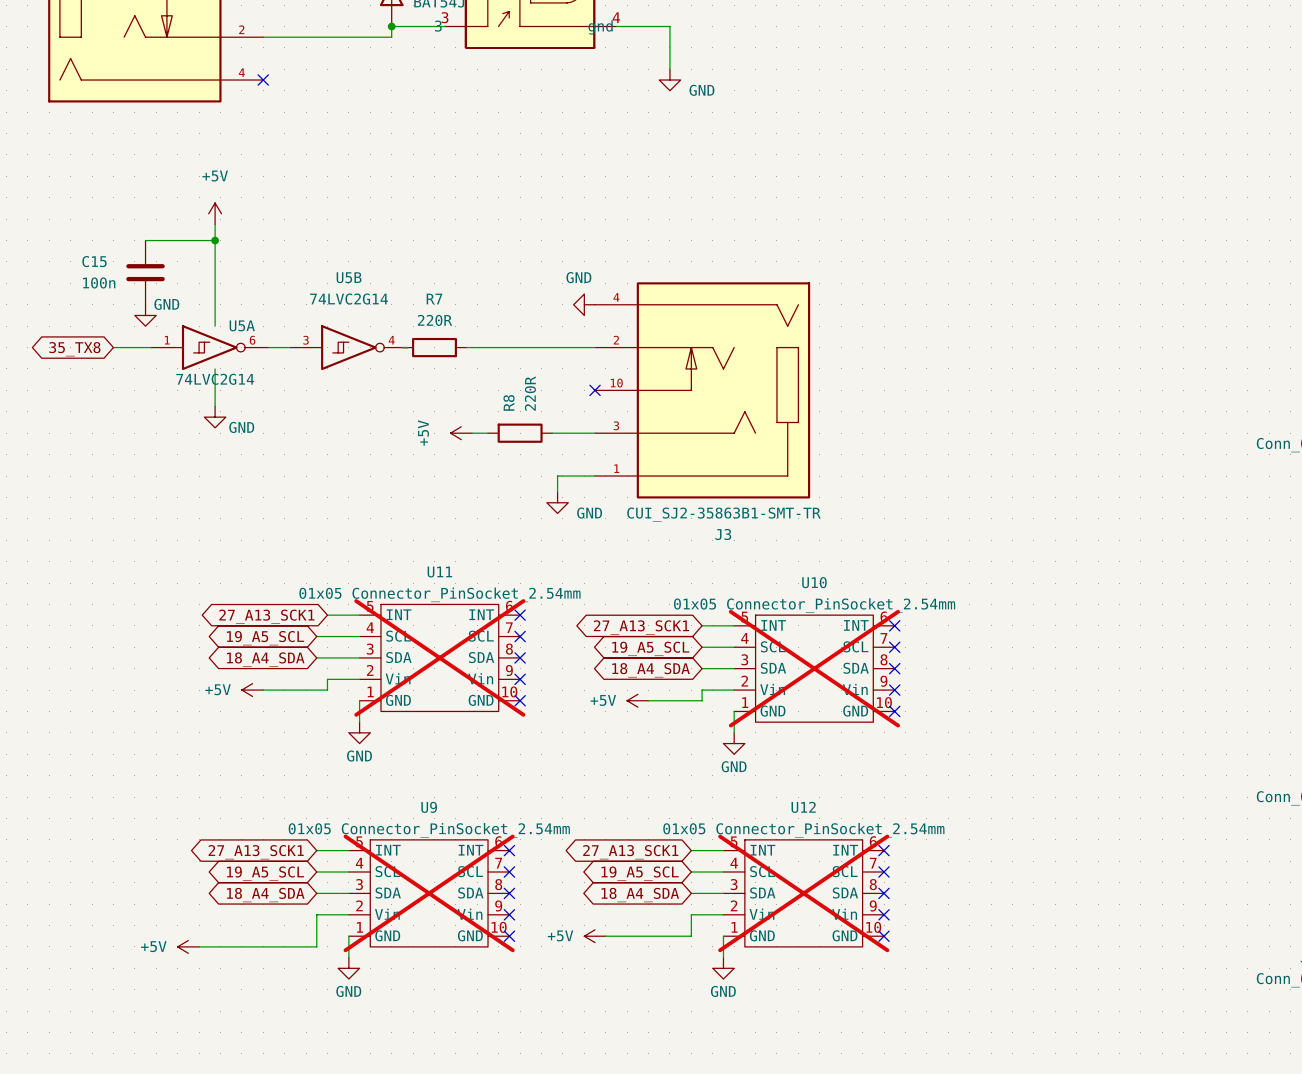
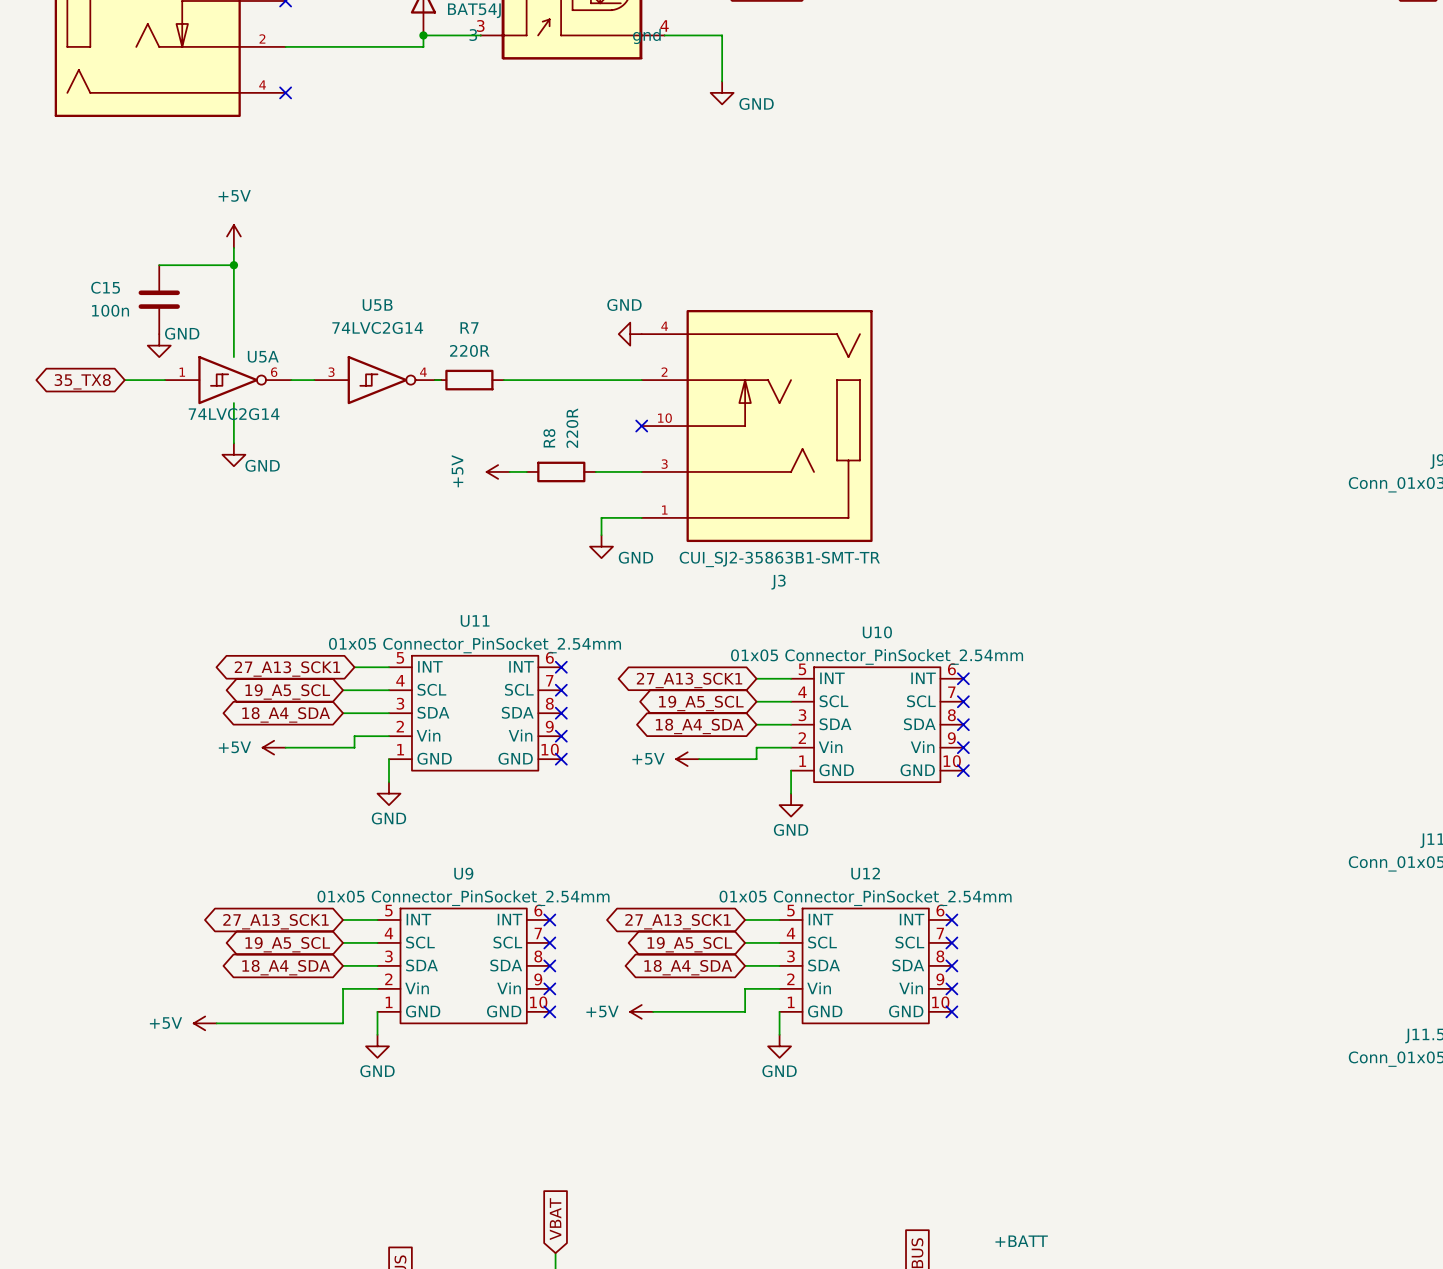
U11 do-not-place cross: (439, 657) -> none
U10 do-not-place cross: (814, 668) -> none
U9 do-not-place cross: (429, 893) -> none
U12 do-not-place cross: (803, 893) -> none

